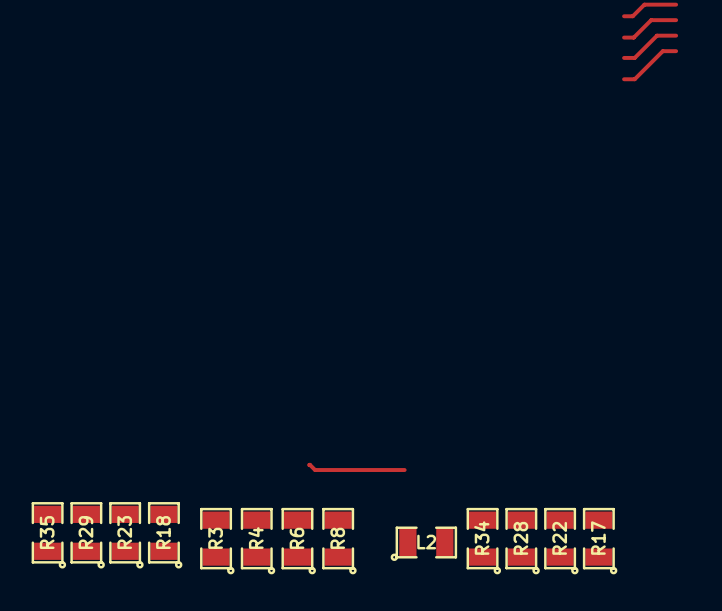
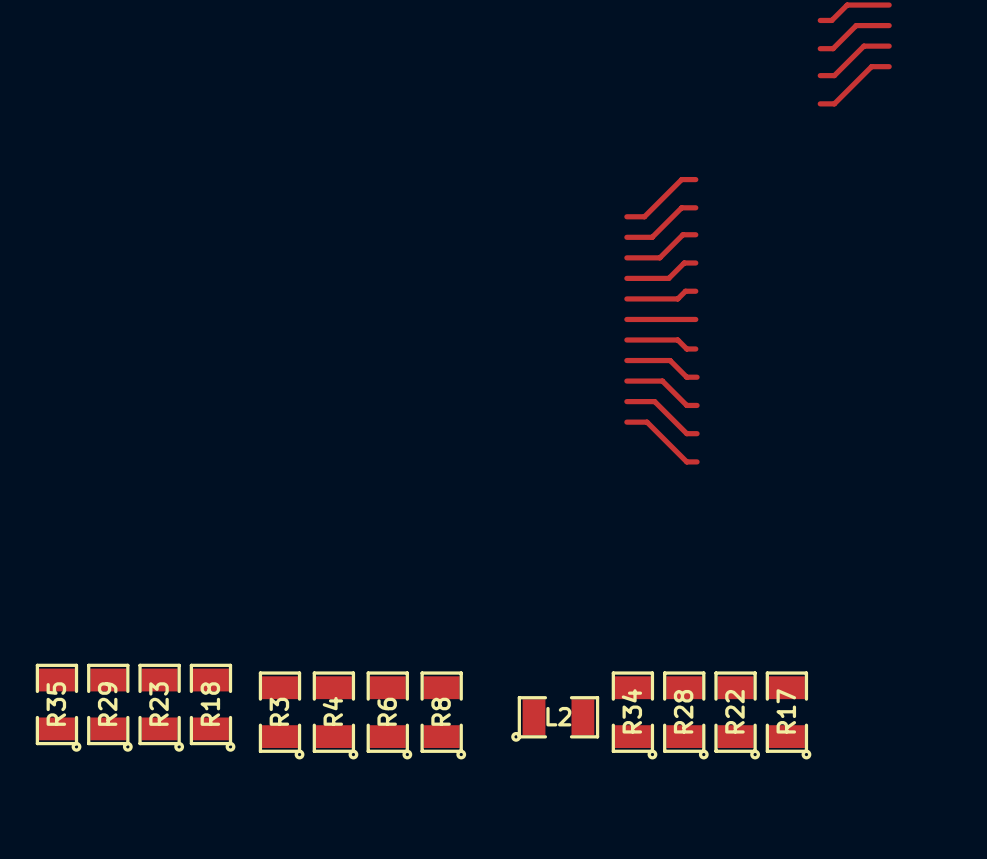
track: none -> (695, 179) (681, 179) (644, 216) (626, 216)
track: none -> (695, 207) (681, 207) (652, 237) (626, 237)
track: none -> (695, 234) (682, 234) (659, 257) (626, 257)
track: none -> (695, 263) (684, 263) (668, 278) (626, 278)
track: none -> (695, 291) (685, 291) (677, 298) (626, 298)
track: none -> (626, 319) (695, 319)
track: none -> (626, 340) (677, 340) (686, 348) (695, 348)
track: none -> (626, 360) (670, 360) (686, 377) (697, 377)
track: none -> (626, 381) (662, 381) (686, 405) (697, 405)
track: none -> (626, 401) (654, 401) (686, 433) (697, 433)
track: none -> (626, 422) (647, 422) (686, 461) (697, 461)
track: (309, 464) (315, 470) (404, 470) -> none

